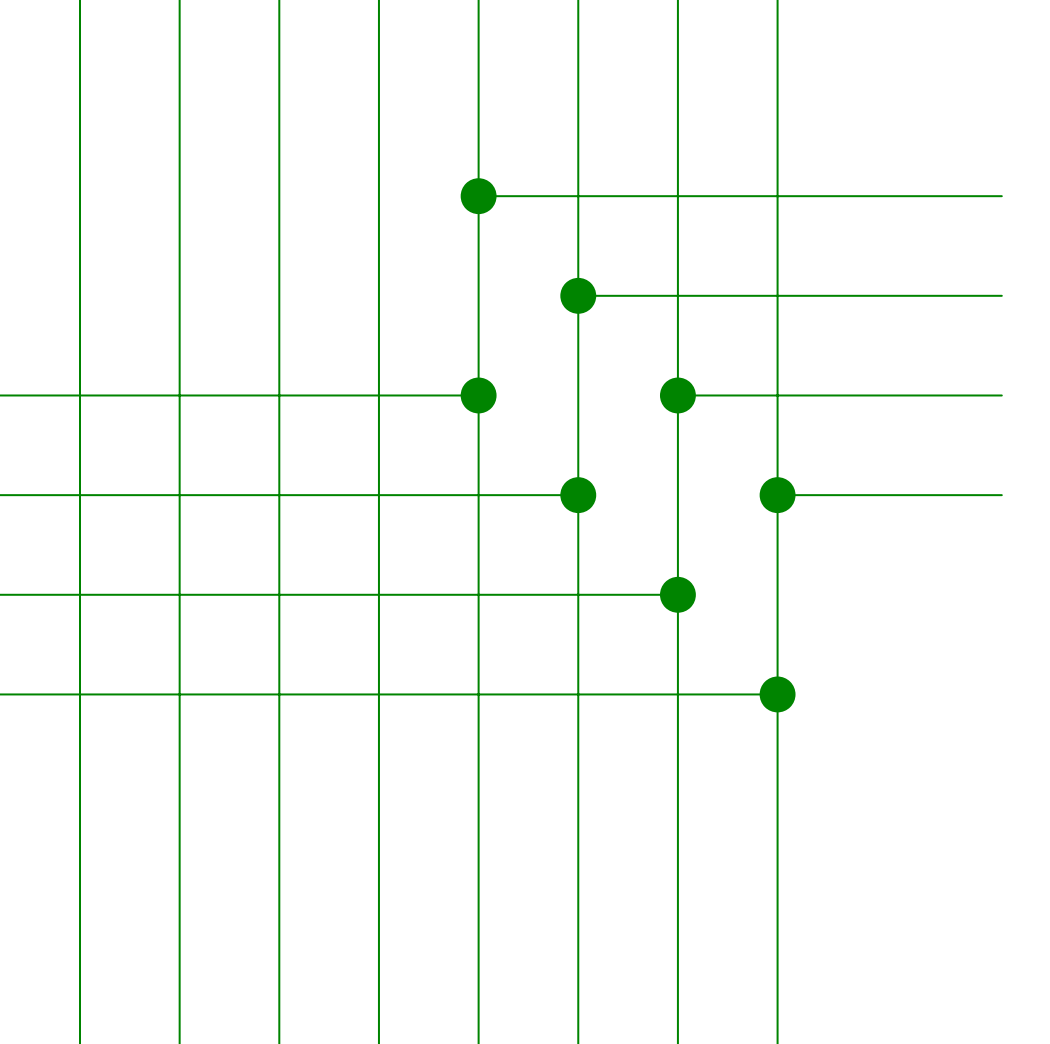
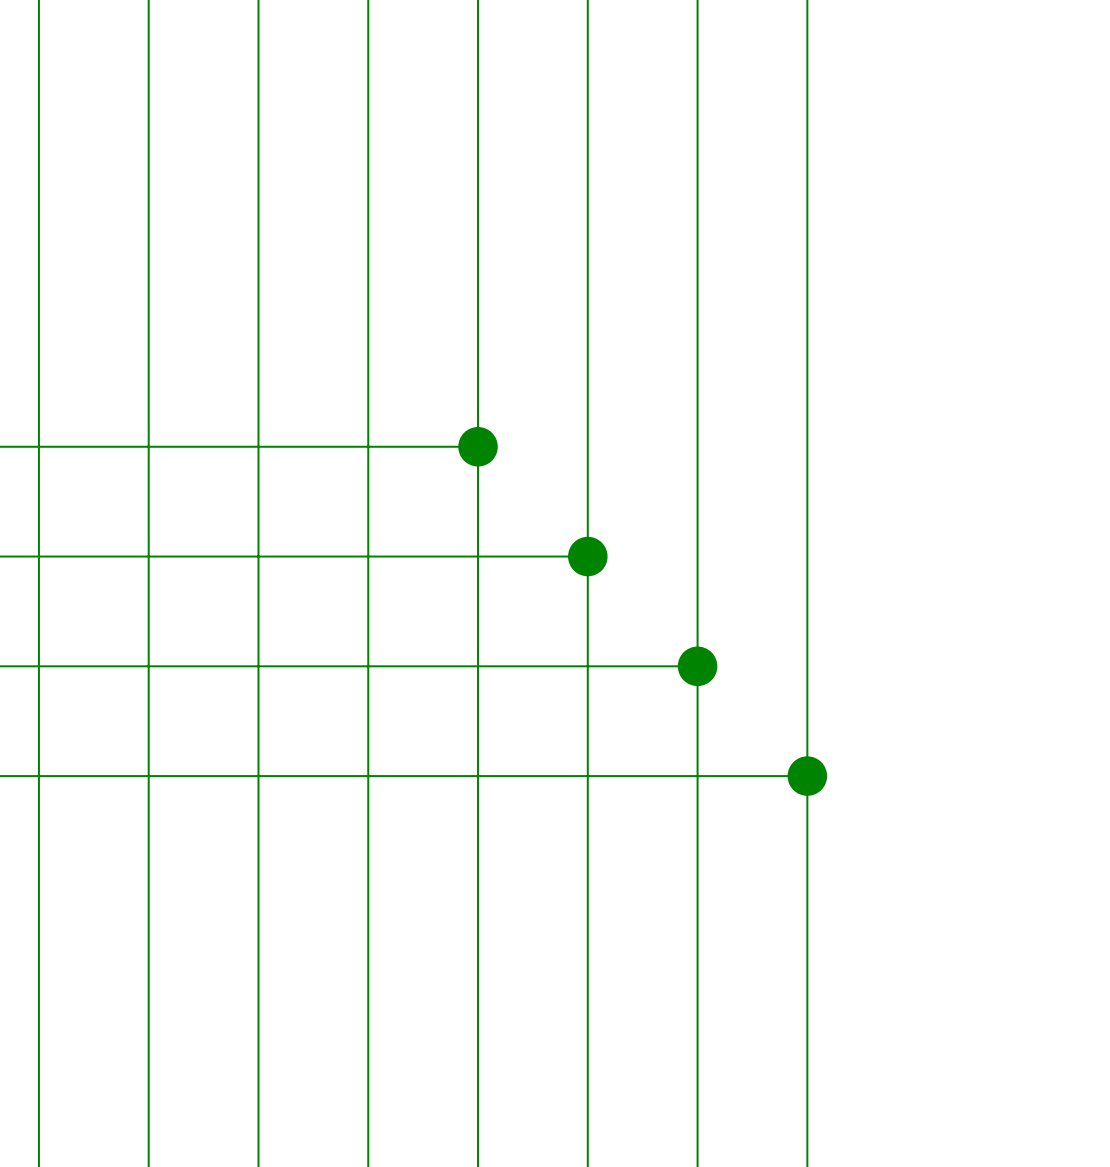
wire: (478, 196) (1001, 196) -> none
junction: (478, 196) -> none
wire: (578, 295) (1001, 295) -> none
junction: (578, 295) -> none
wire: (677, 395) (1001, 395) -> none
junction: (677, 395) -> none
wire: (777, 495) (1001, 495) -> none
junction: (777, 495) -> none

